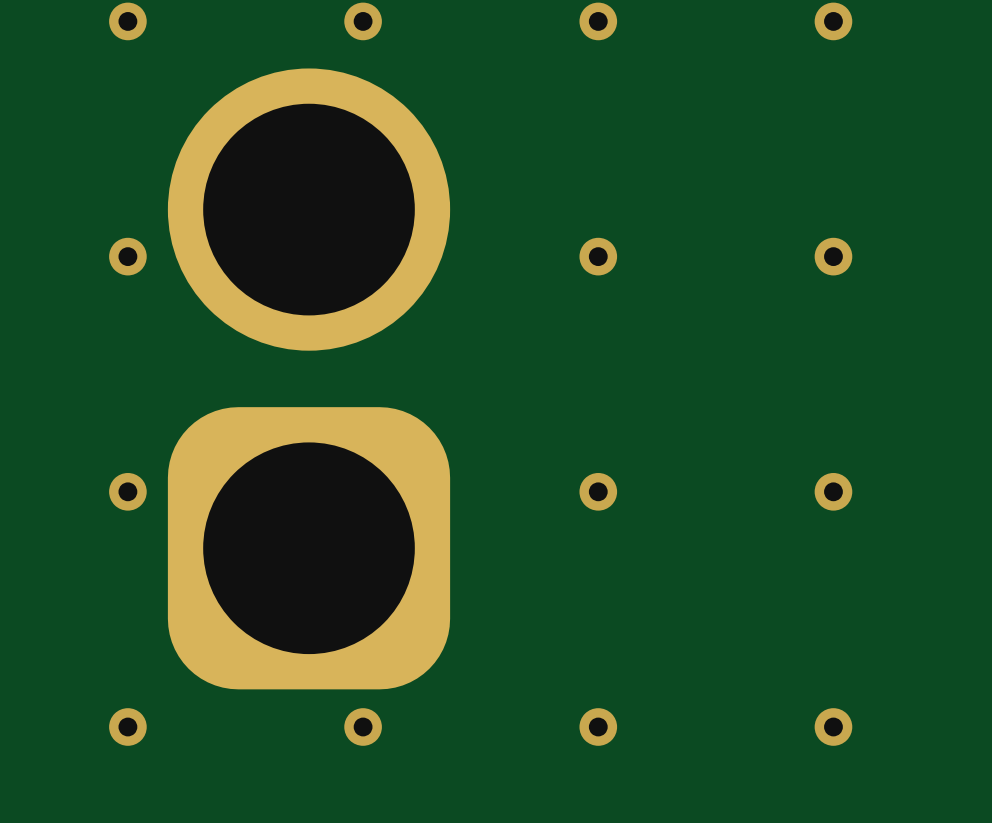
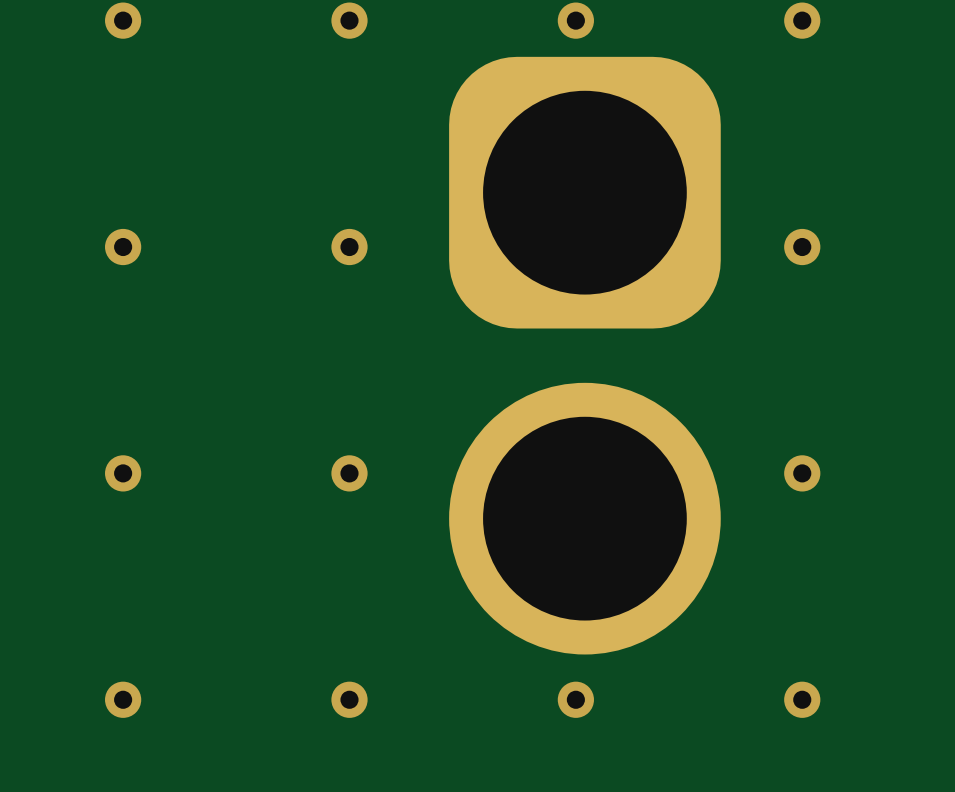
via: none -> (349, 247)
via: (598, 256) -> none
part rotation: 0° (309, 378) -> 180° (584, 355)
via: none -> (349, 473)
via: (598, 491) -> none

